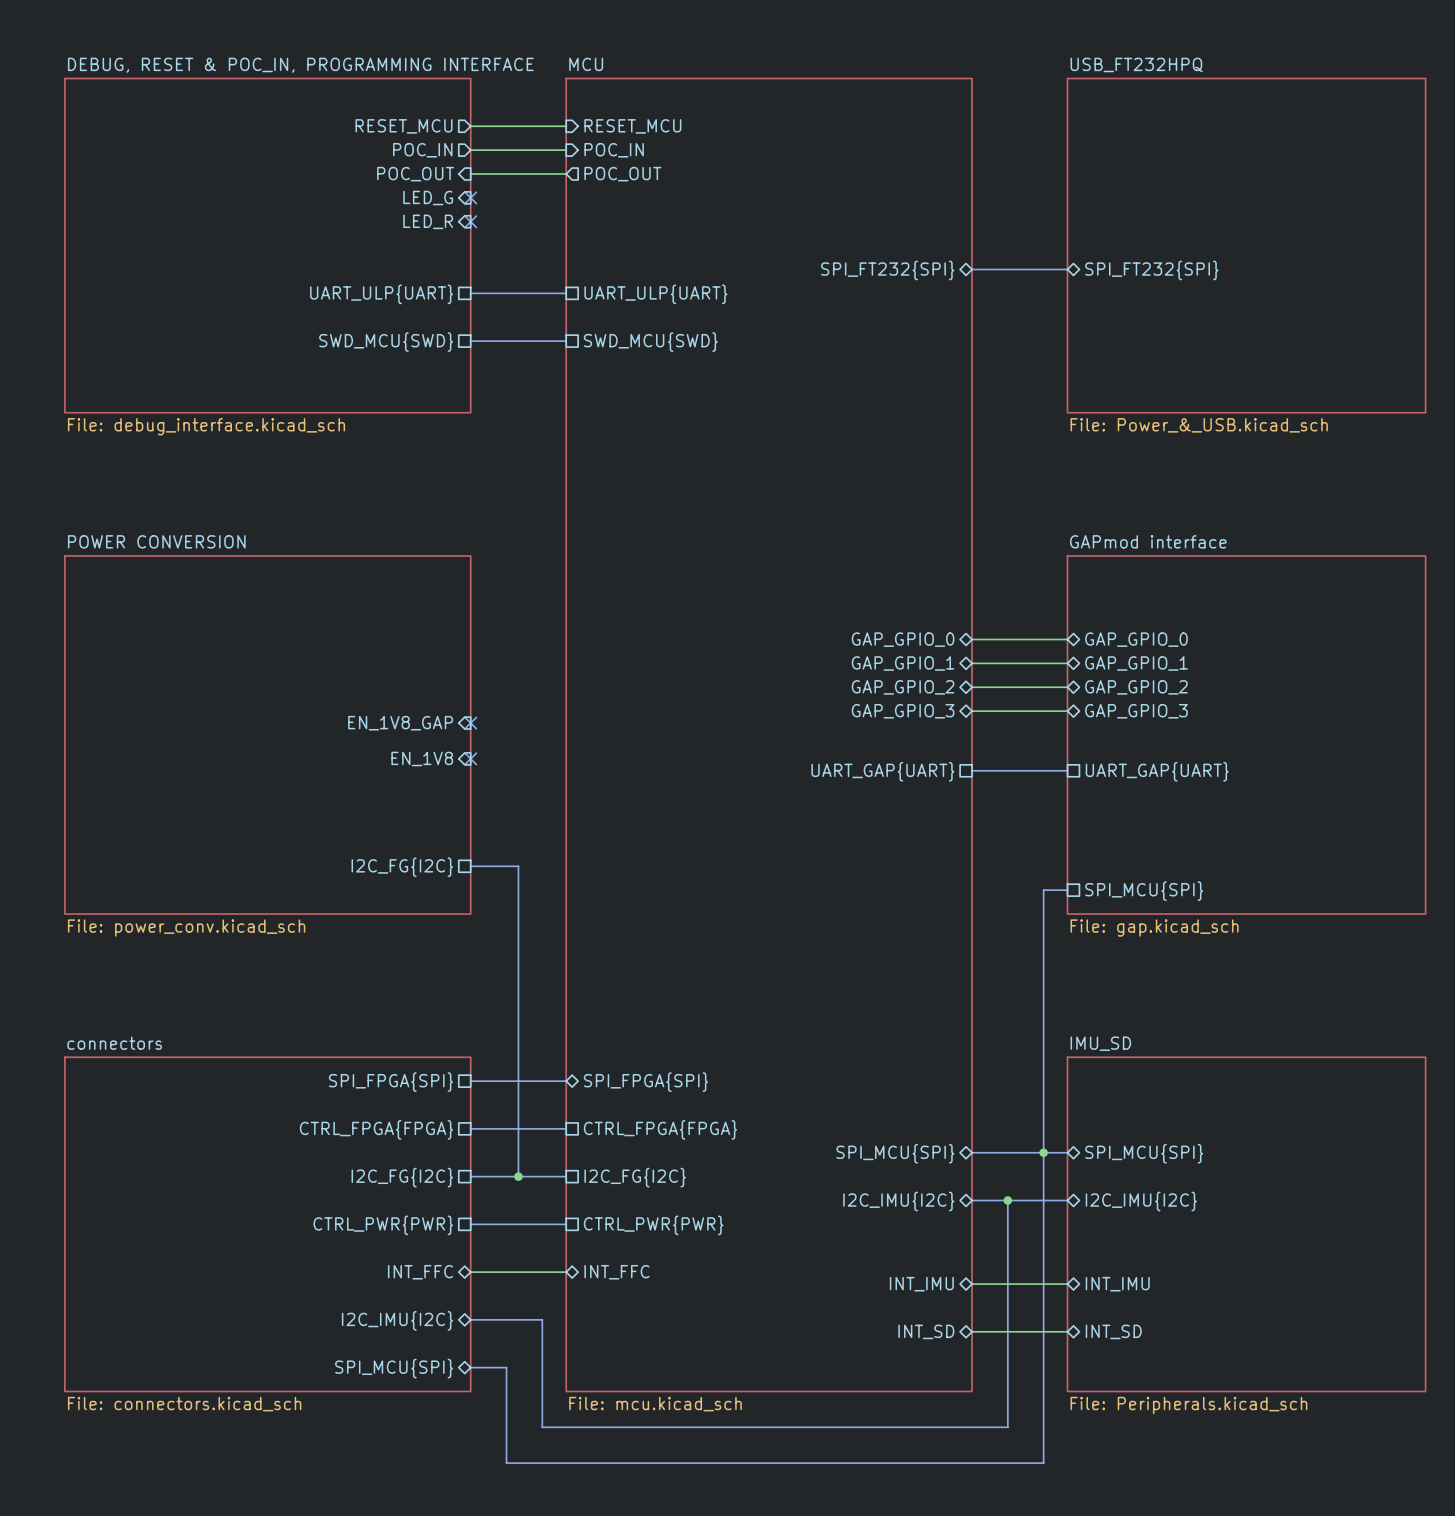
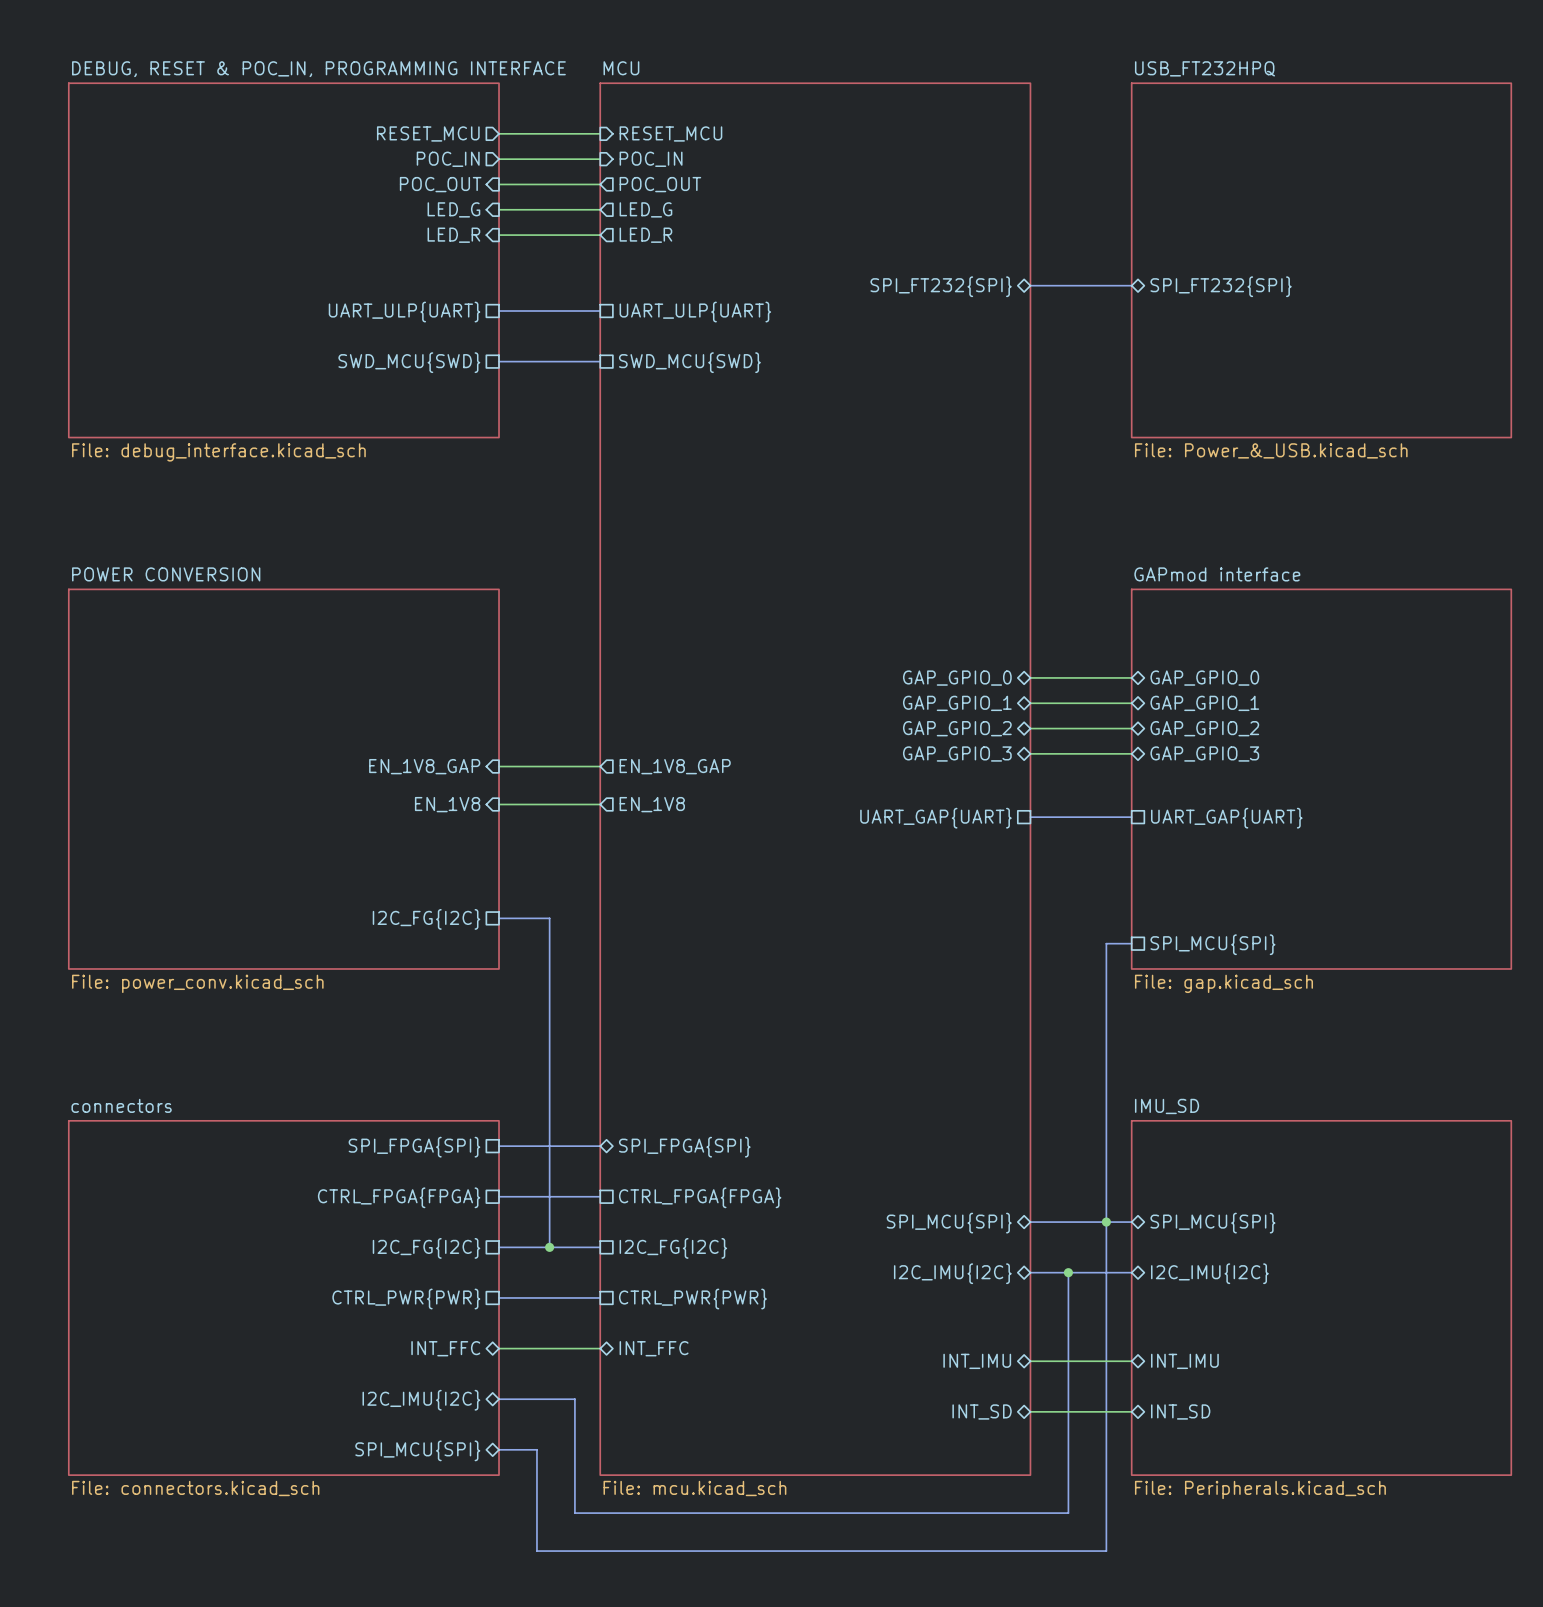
wire: none -> (499, 209) (600, 209)
no-connect mark: (470, 197) -> none
sheet pin: none -> LED_G (645, 209)
wire: none -> (499, 235) (600, 235)
no-connect mark: (470, 221) -> none
sheet pin: none -> LED_R (645, 235)
wire: none -> (499, 766) (600, 766)
no-connect mark: (470, 723) -> none
sheet pin: none -> EN_1V8_GAP (675, 766)
wire: none -> (499, 804) (600, 804)
no-connect mark: (470, 758) -> none
sheet pin: none -> EN_1V8 (652, 804)

